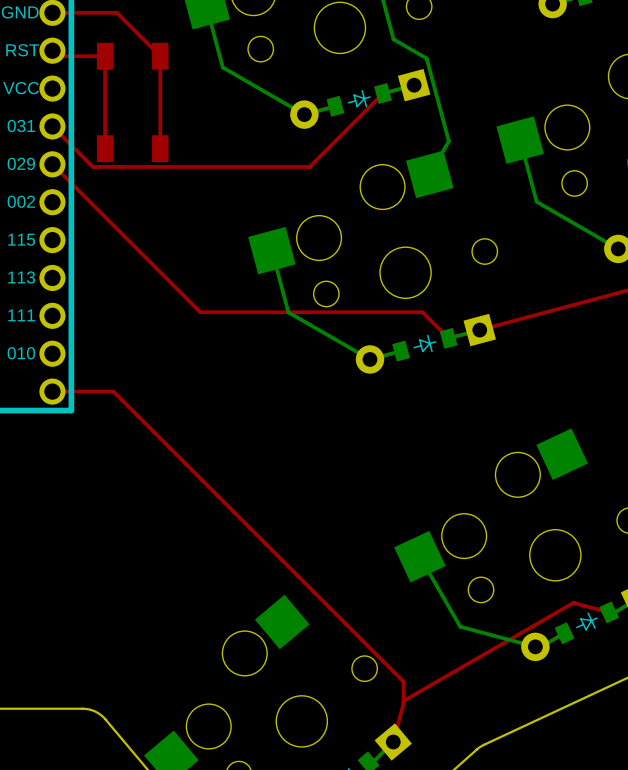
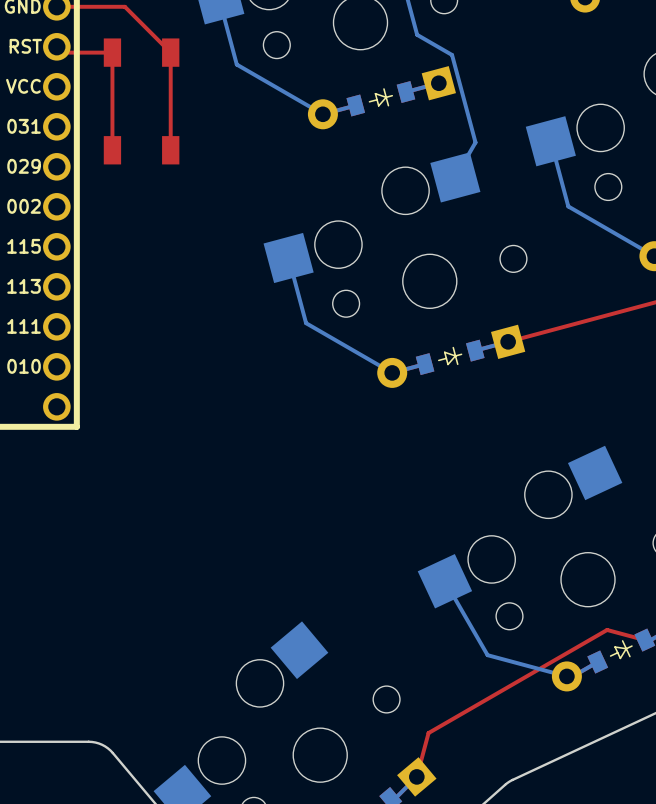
top track: (383, 93) (309, 166) (92, 166) (52, 126) -> none
top track: (52, 164) (200, 312) (422, 312) (448, 338) -> none
top track: (52, 391) (113, 391) (403, 681) (403, 703) -> none

